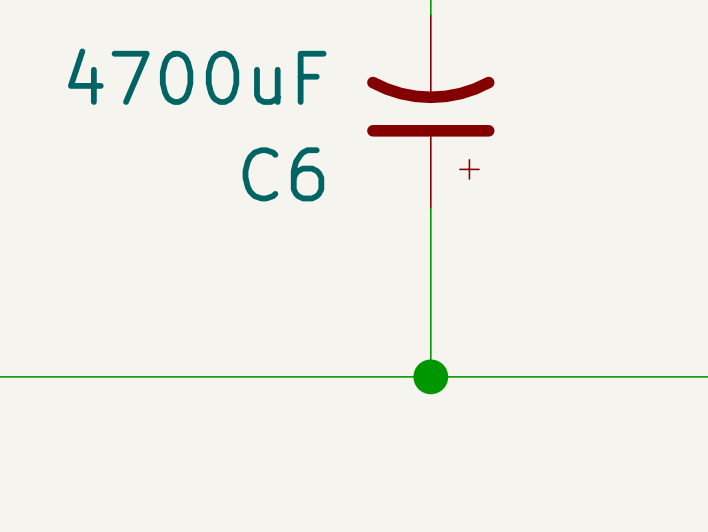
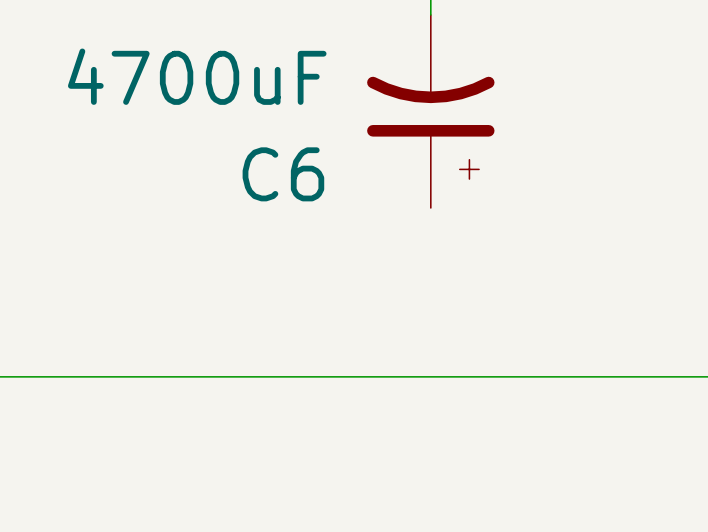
wire: (430, 207) (430, 376) -> none
junction: (430, 376) -> none

